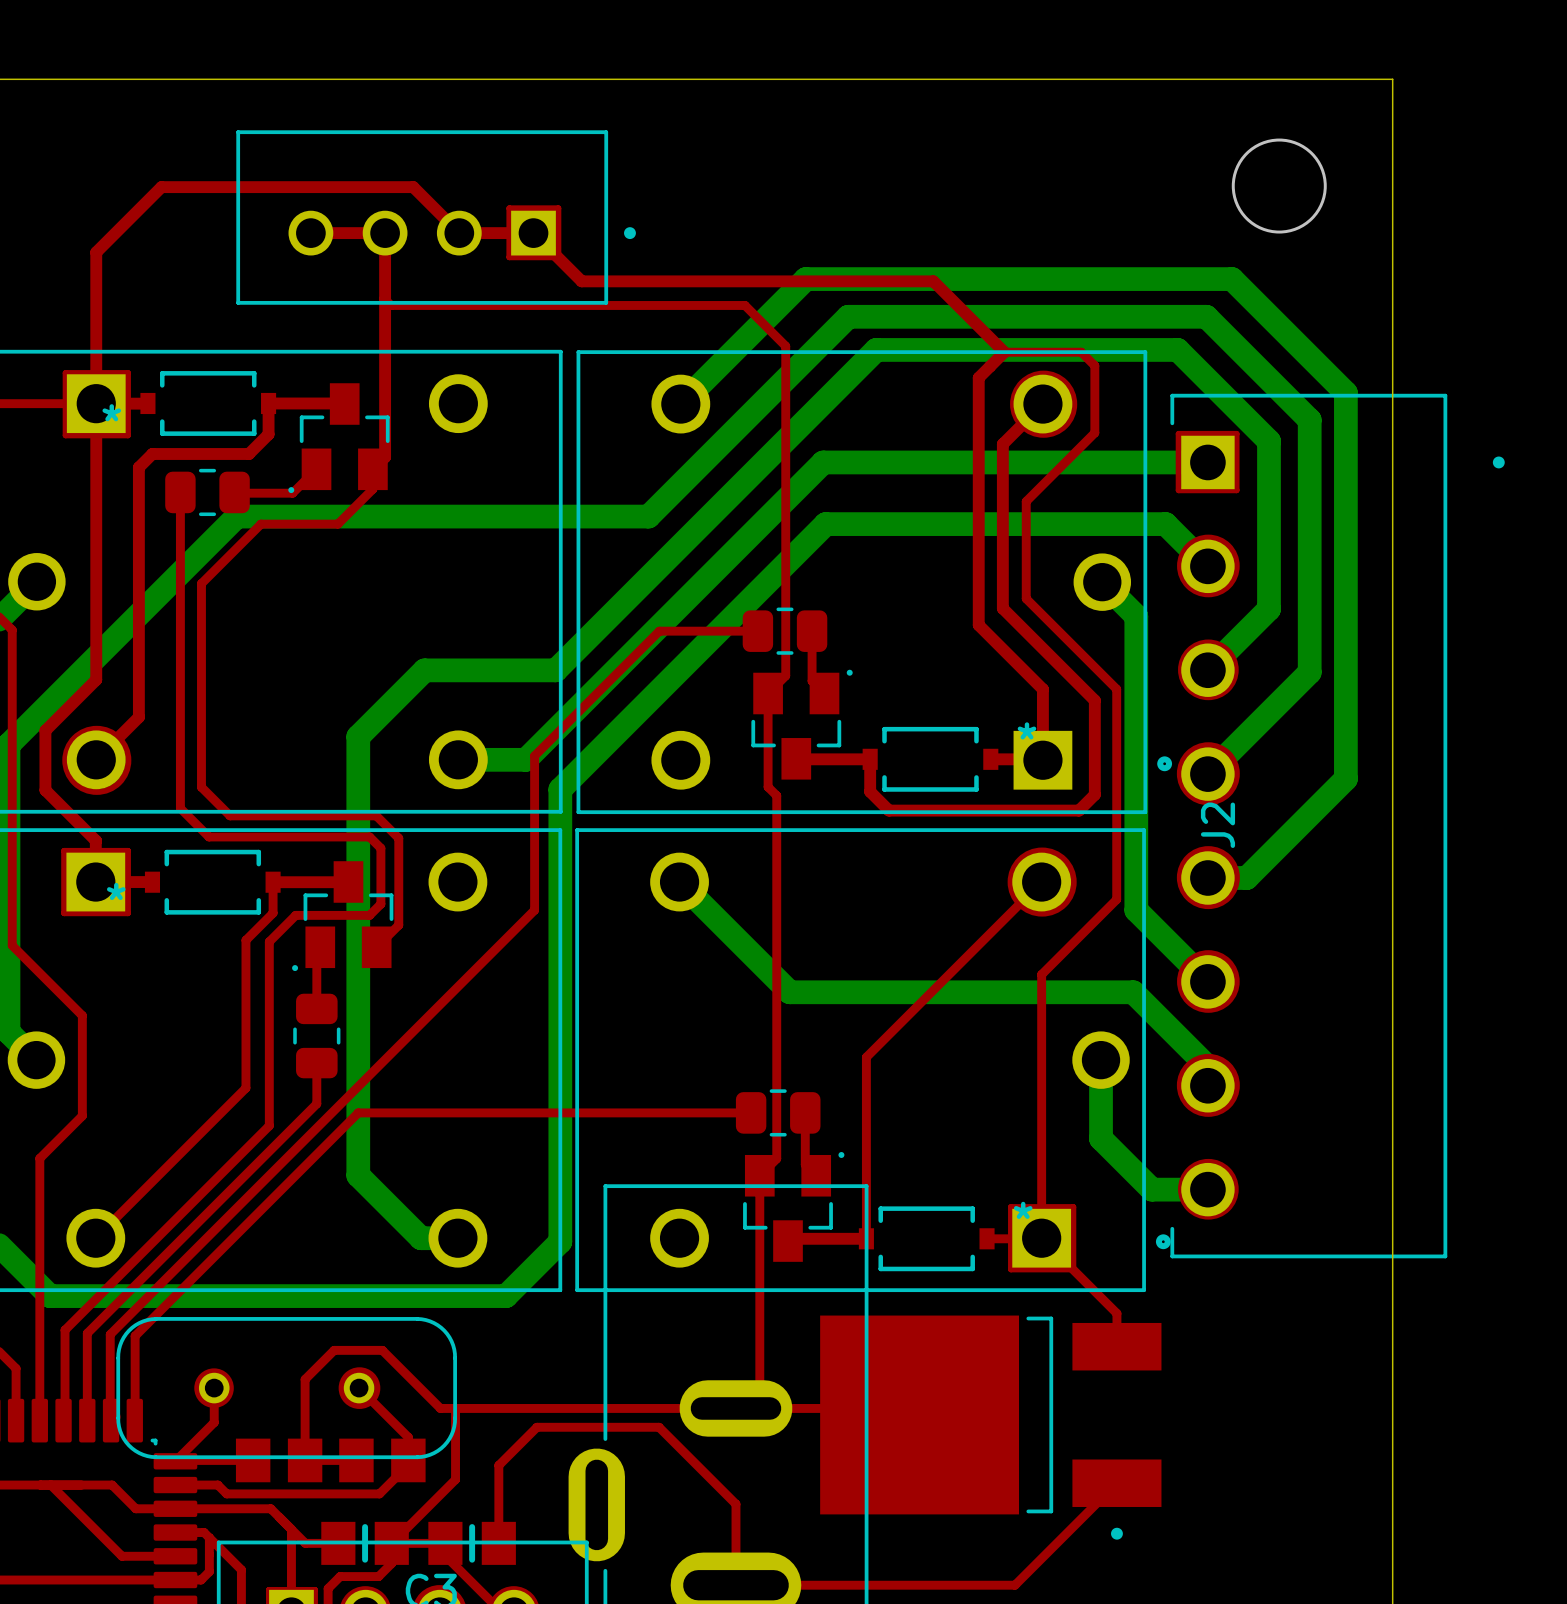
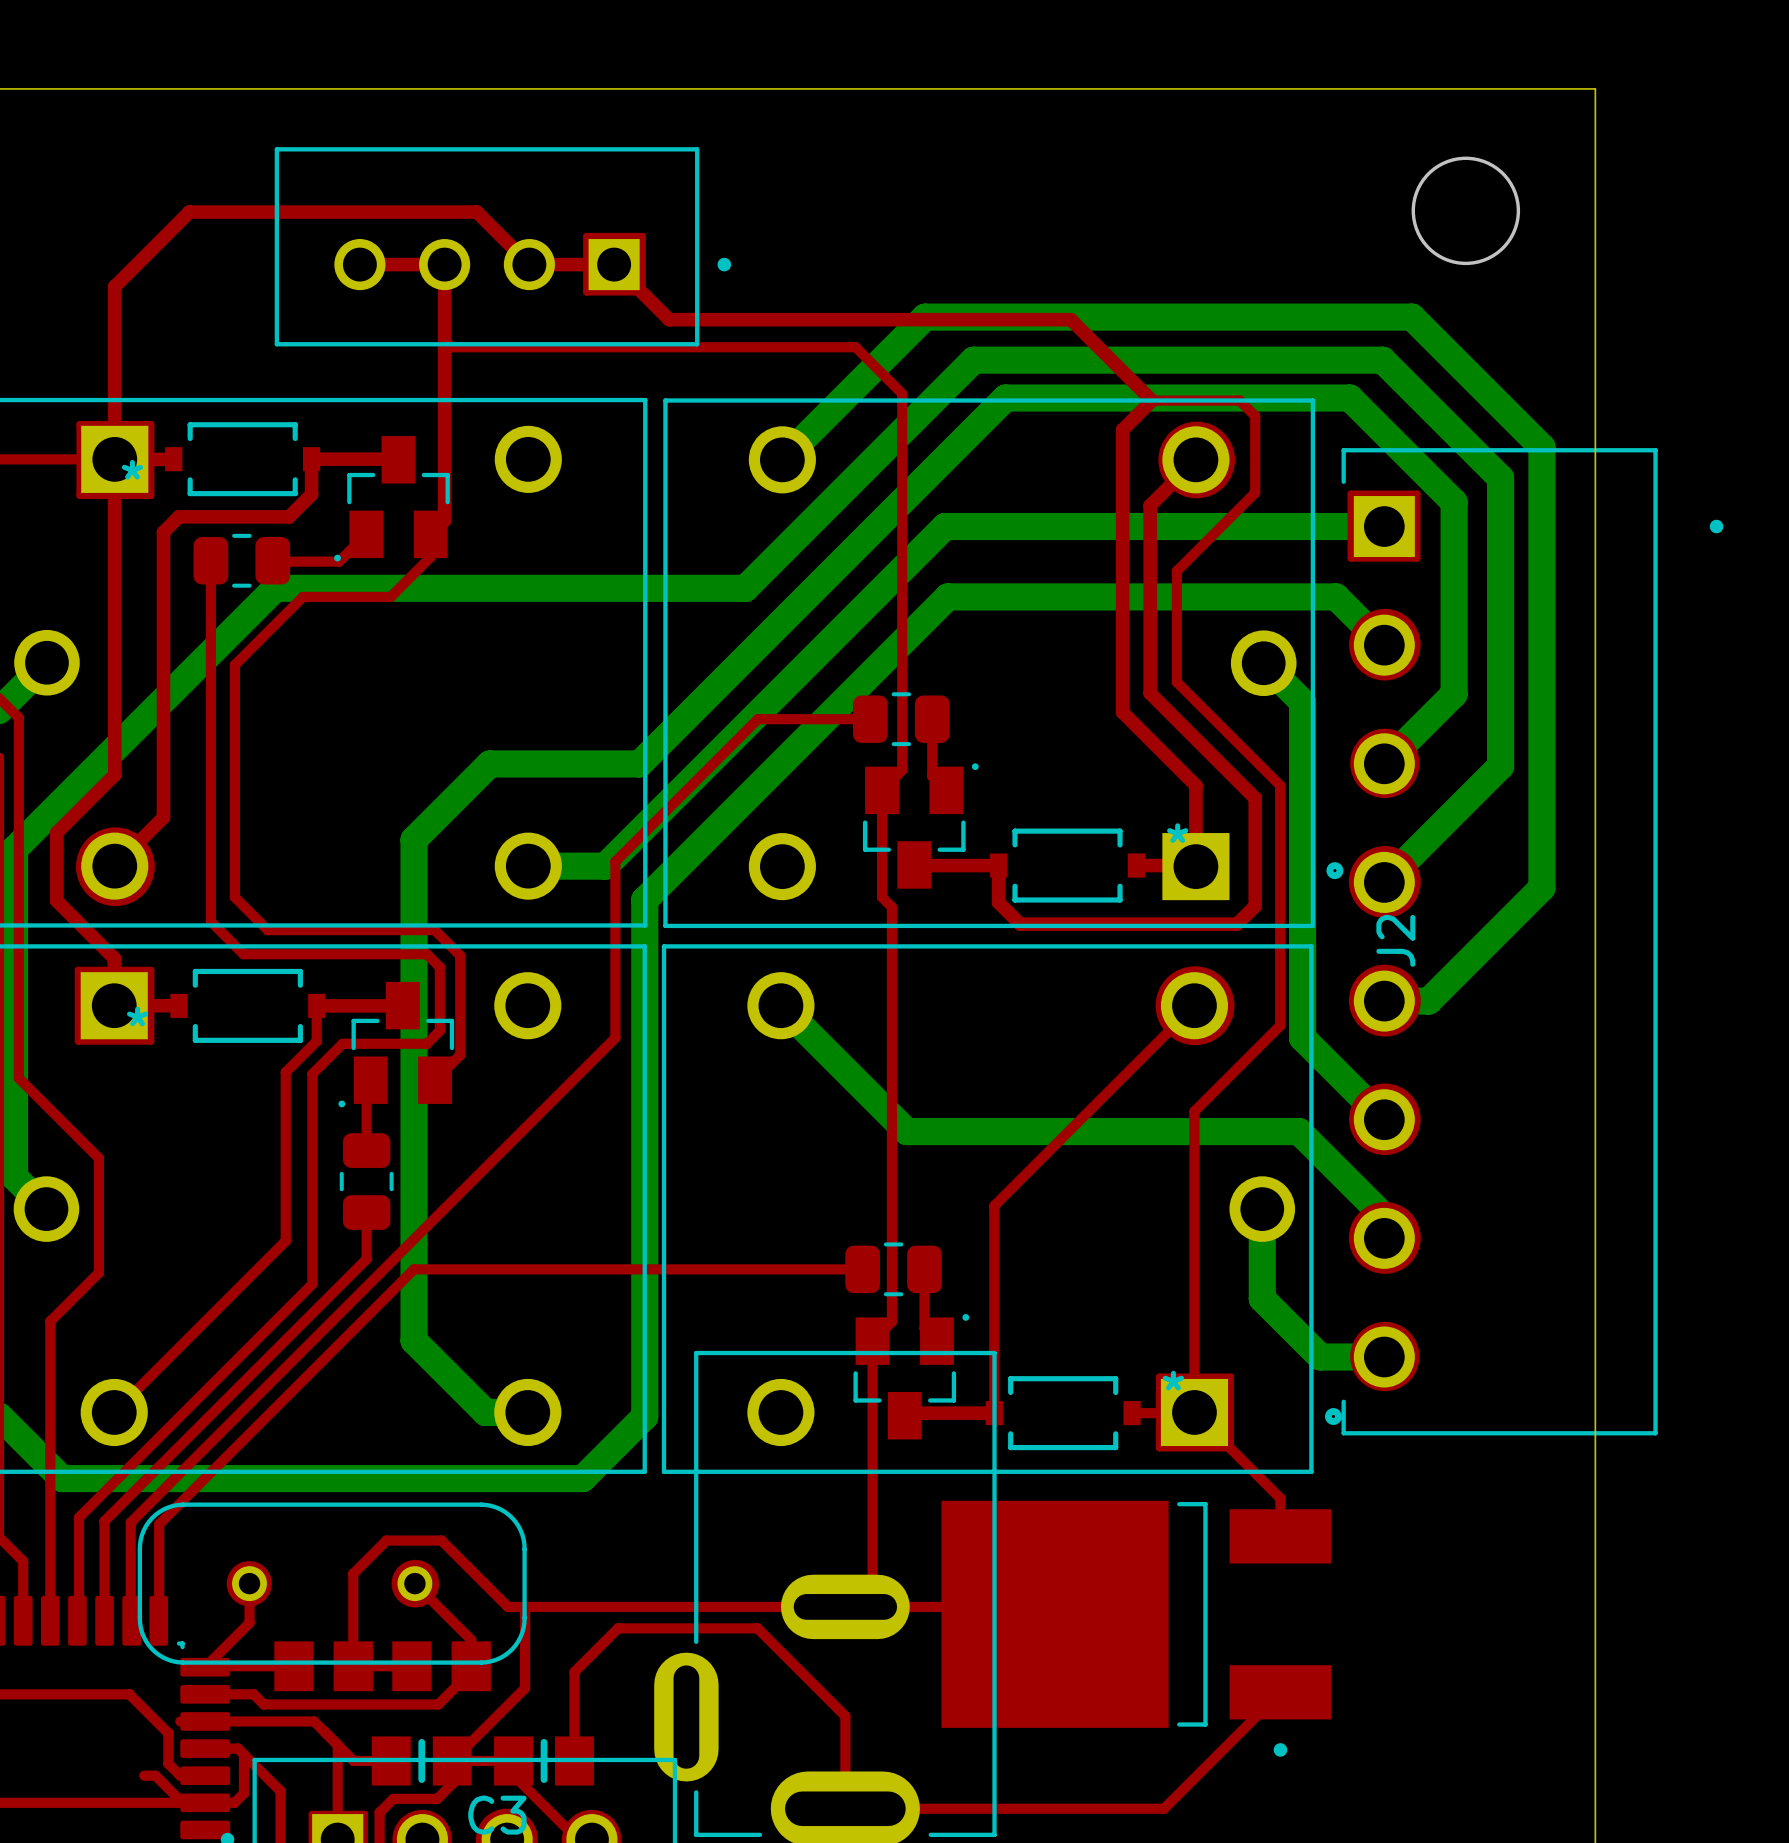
top track: (50, 1485) (122, 1556) -> none
top track: (109, 1485) (112, 1485) (135, 1508) (153, 1508) -> (129, 1694) (168, 1733) (168, 1763) (180, 1775)
top track: (131, 1556) (153, 1556) -> (155, 1775) (182, 1802)

